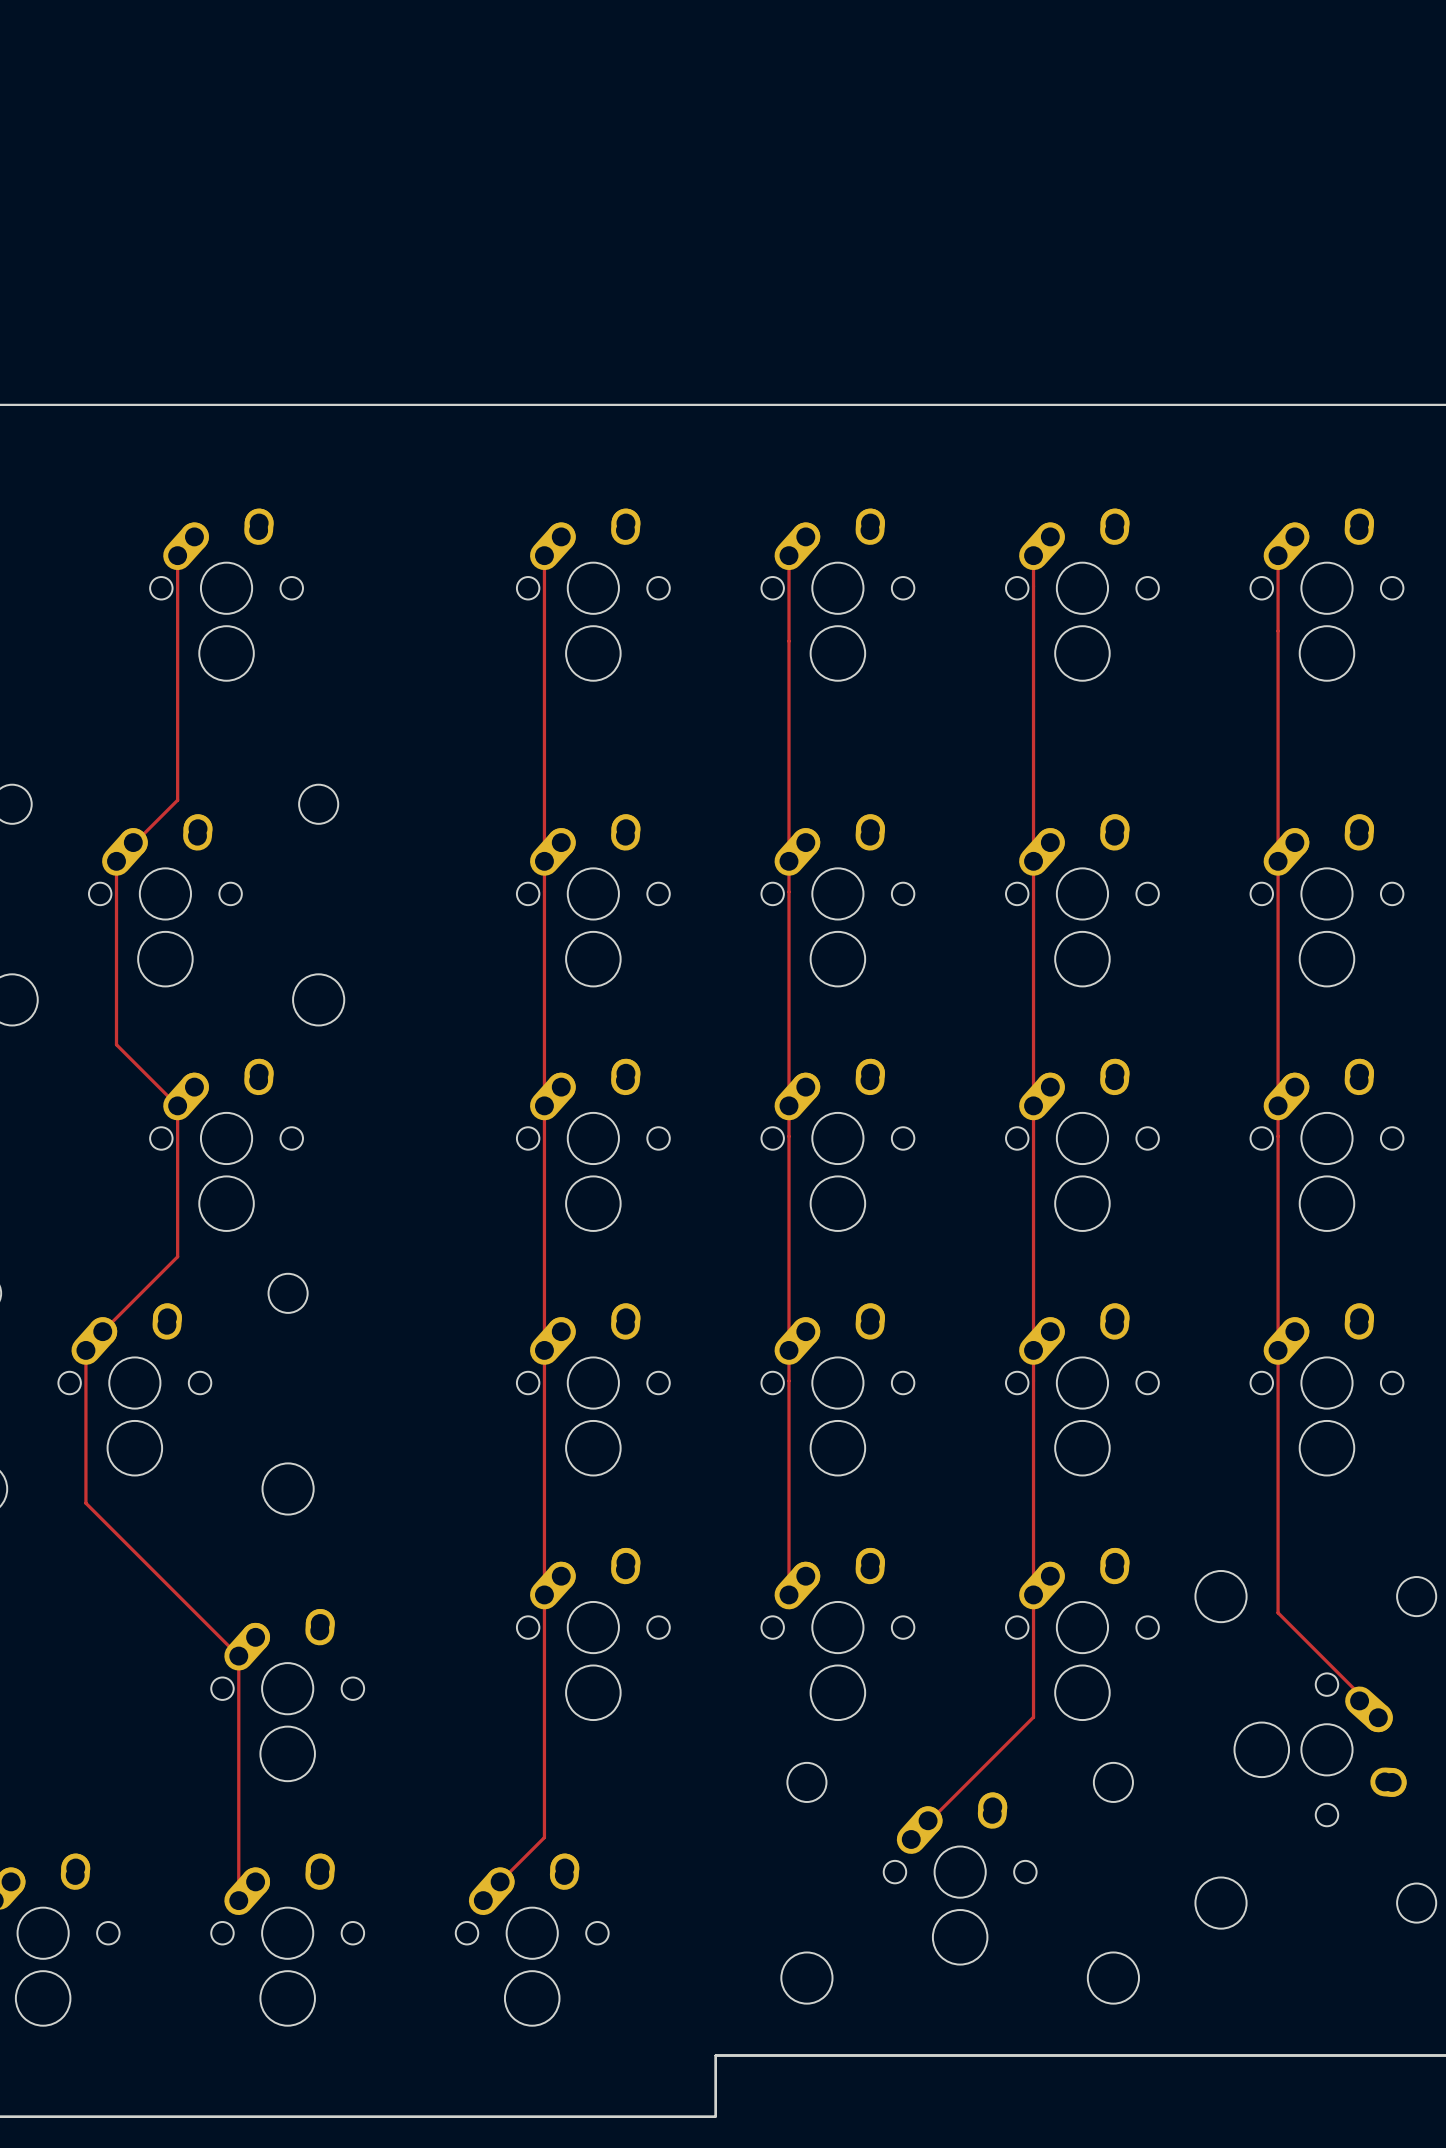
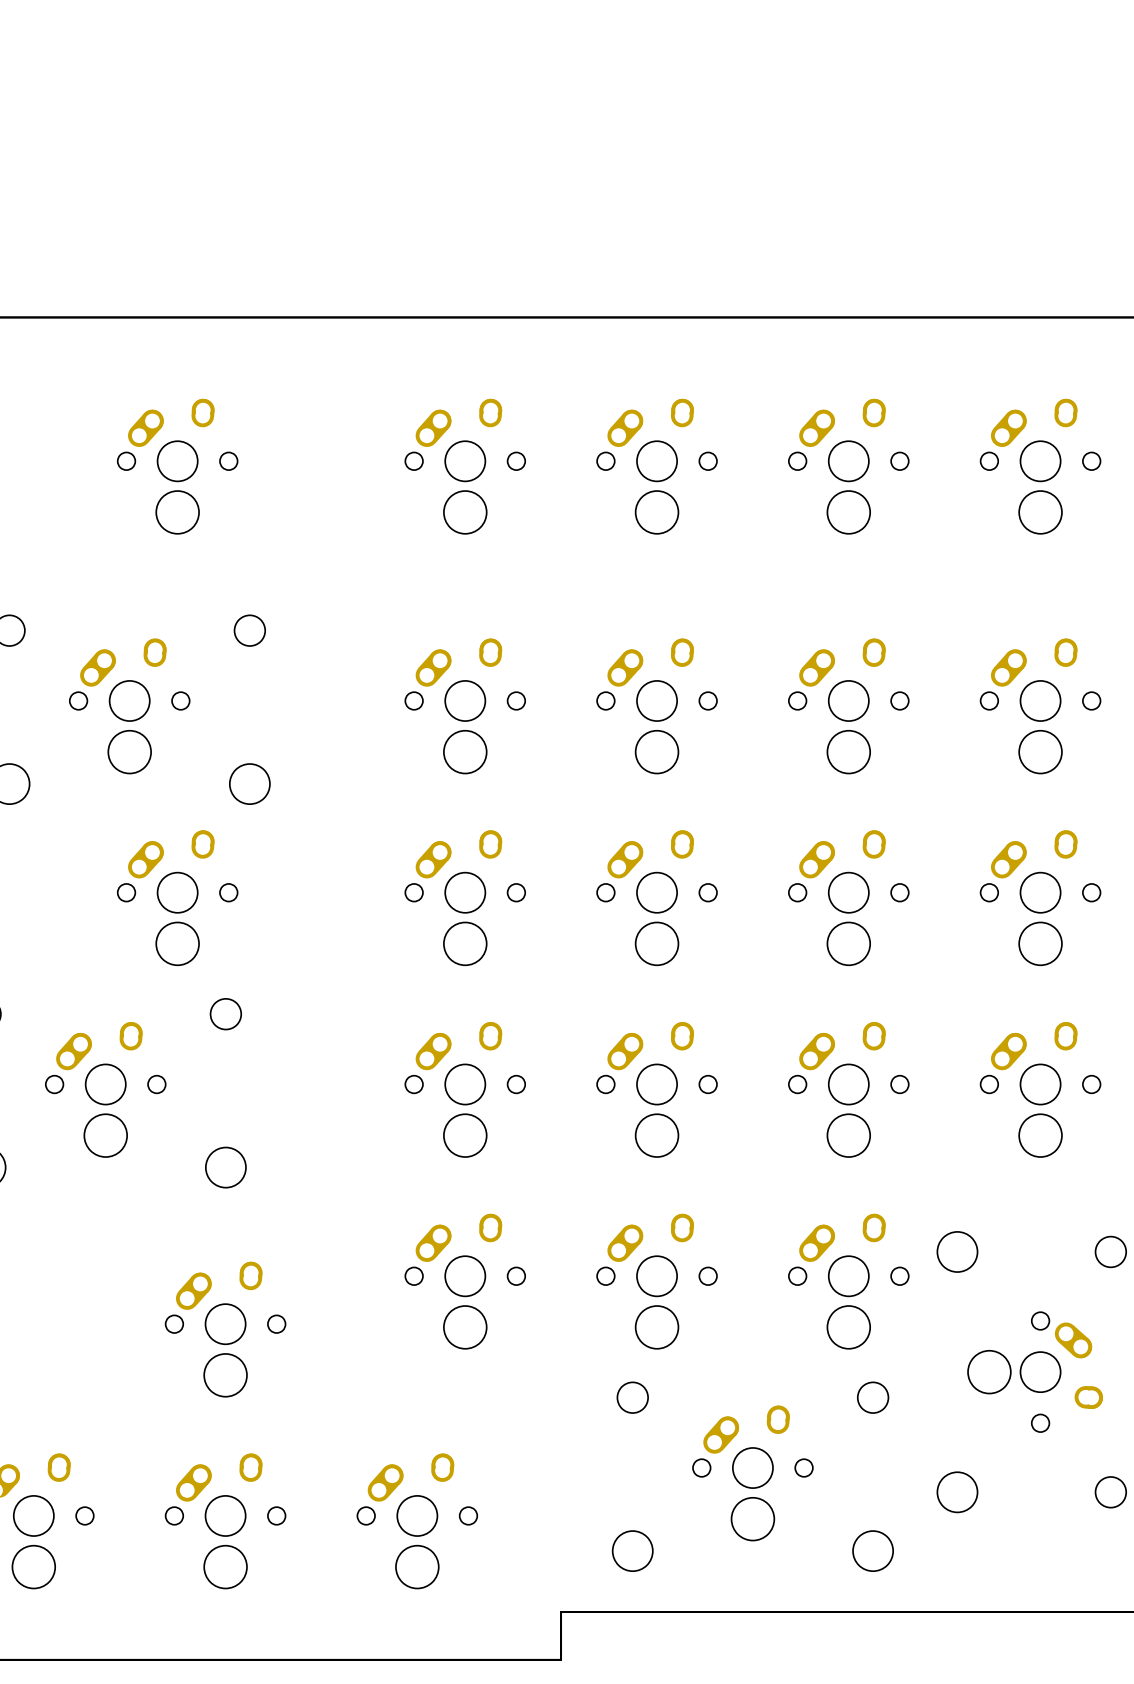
track: (177, 555) (177, 800) (116, 861) (116, 1044) (177, 1105) (177, 1256) (102, 1331) -> none
track: (544, 555) (544, 1837) (500, 1881) -> none
track: (788, 555) (788, 1594) -> none
track: (1033, 555) (1033, 1717) (911, 1839) -> none
track: (1278, 555) (1278, 1612) (1359, 1694) (1359, 1700) -> none
track: (85, 1350) (85, 1503) (238, 1656) (238, 1900) -> none

